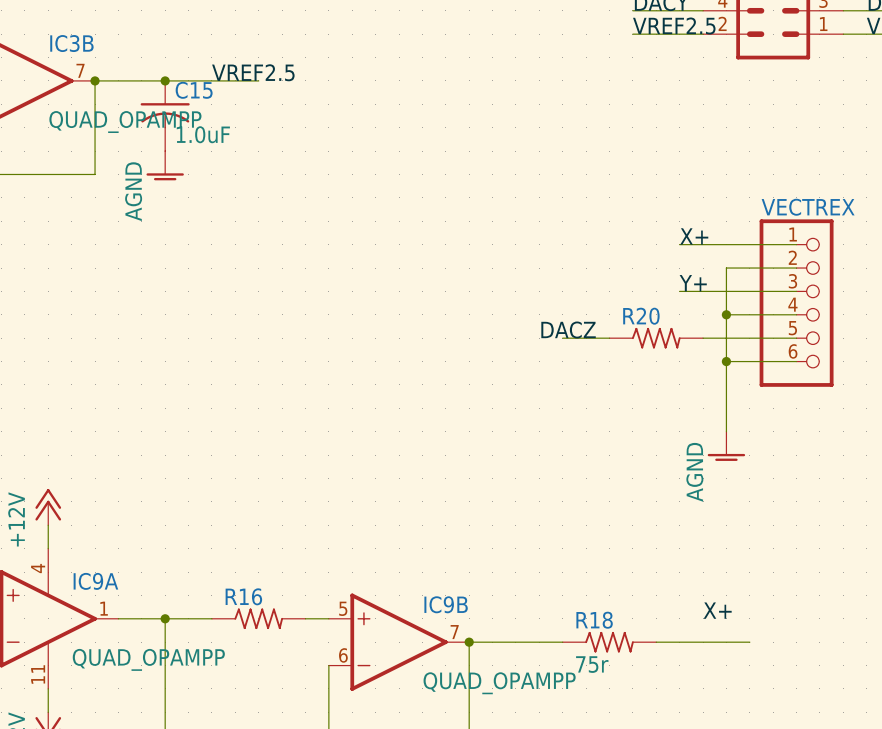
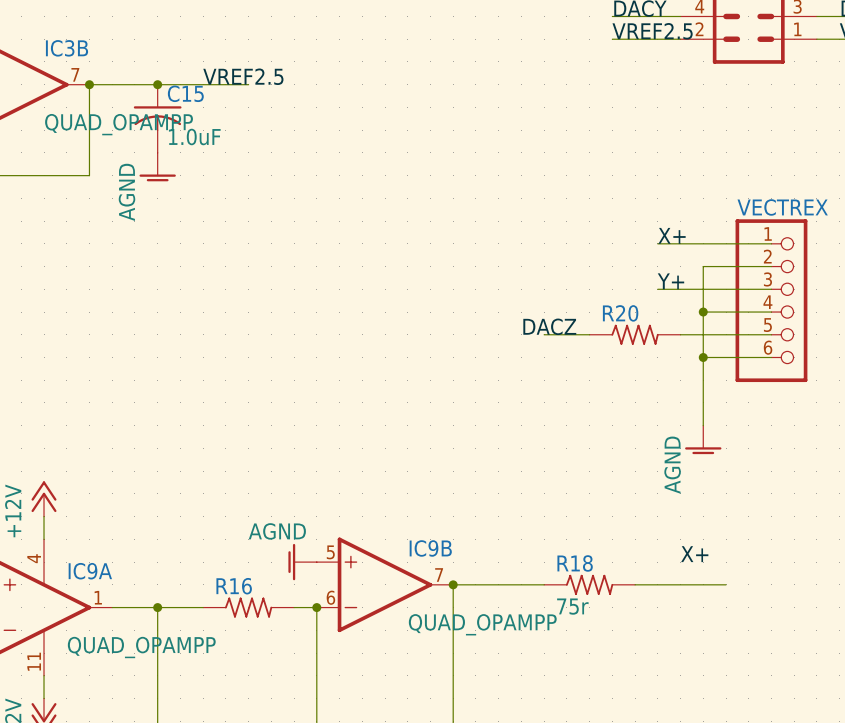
power symbol: none -> AGND (302, 562)
label position: X+ (717, 610) -> X+ (694, 554)
wire: none -> (316, 607) (316, 653)
junction: none -> (316, 607)
IC9B position: (399, 642) -> (385, 584)
wire: (469, 642) (562, 642) -> (453, 630) (453, 584) (544, 584)
junction position: (469, 642) -> (453, 584)
R18 position: (609, 642) -> (589, 584)
wire: (656, 642) (749, 642) -> (635, 584) (726, 584)

